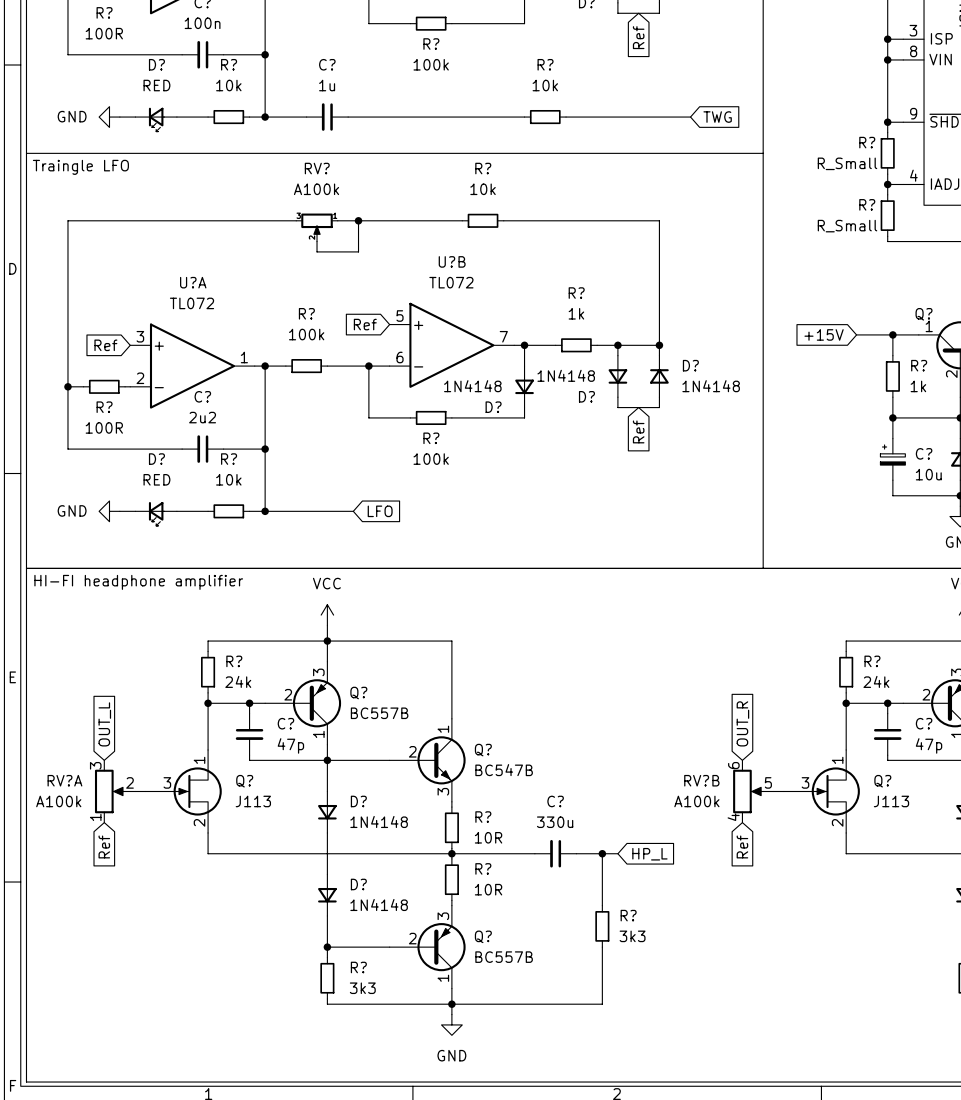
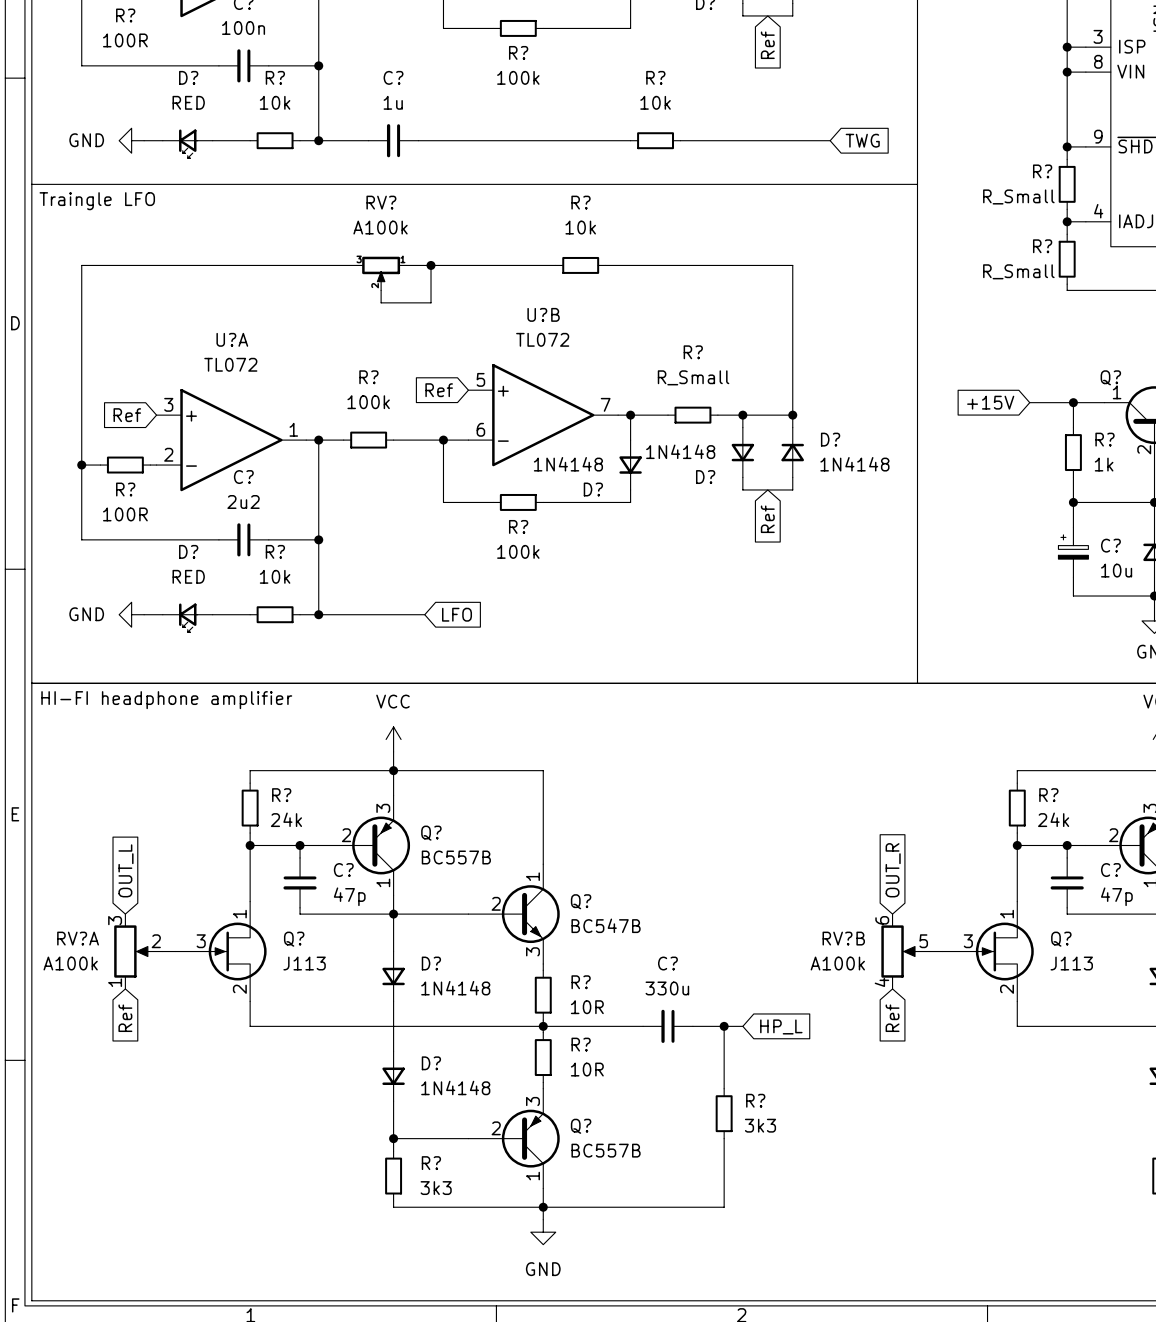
R? value: 1k (576, 313) -> R_Small (693, 377)

